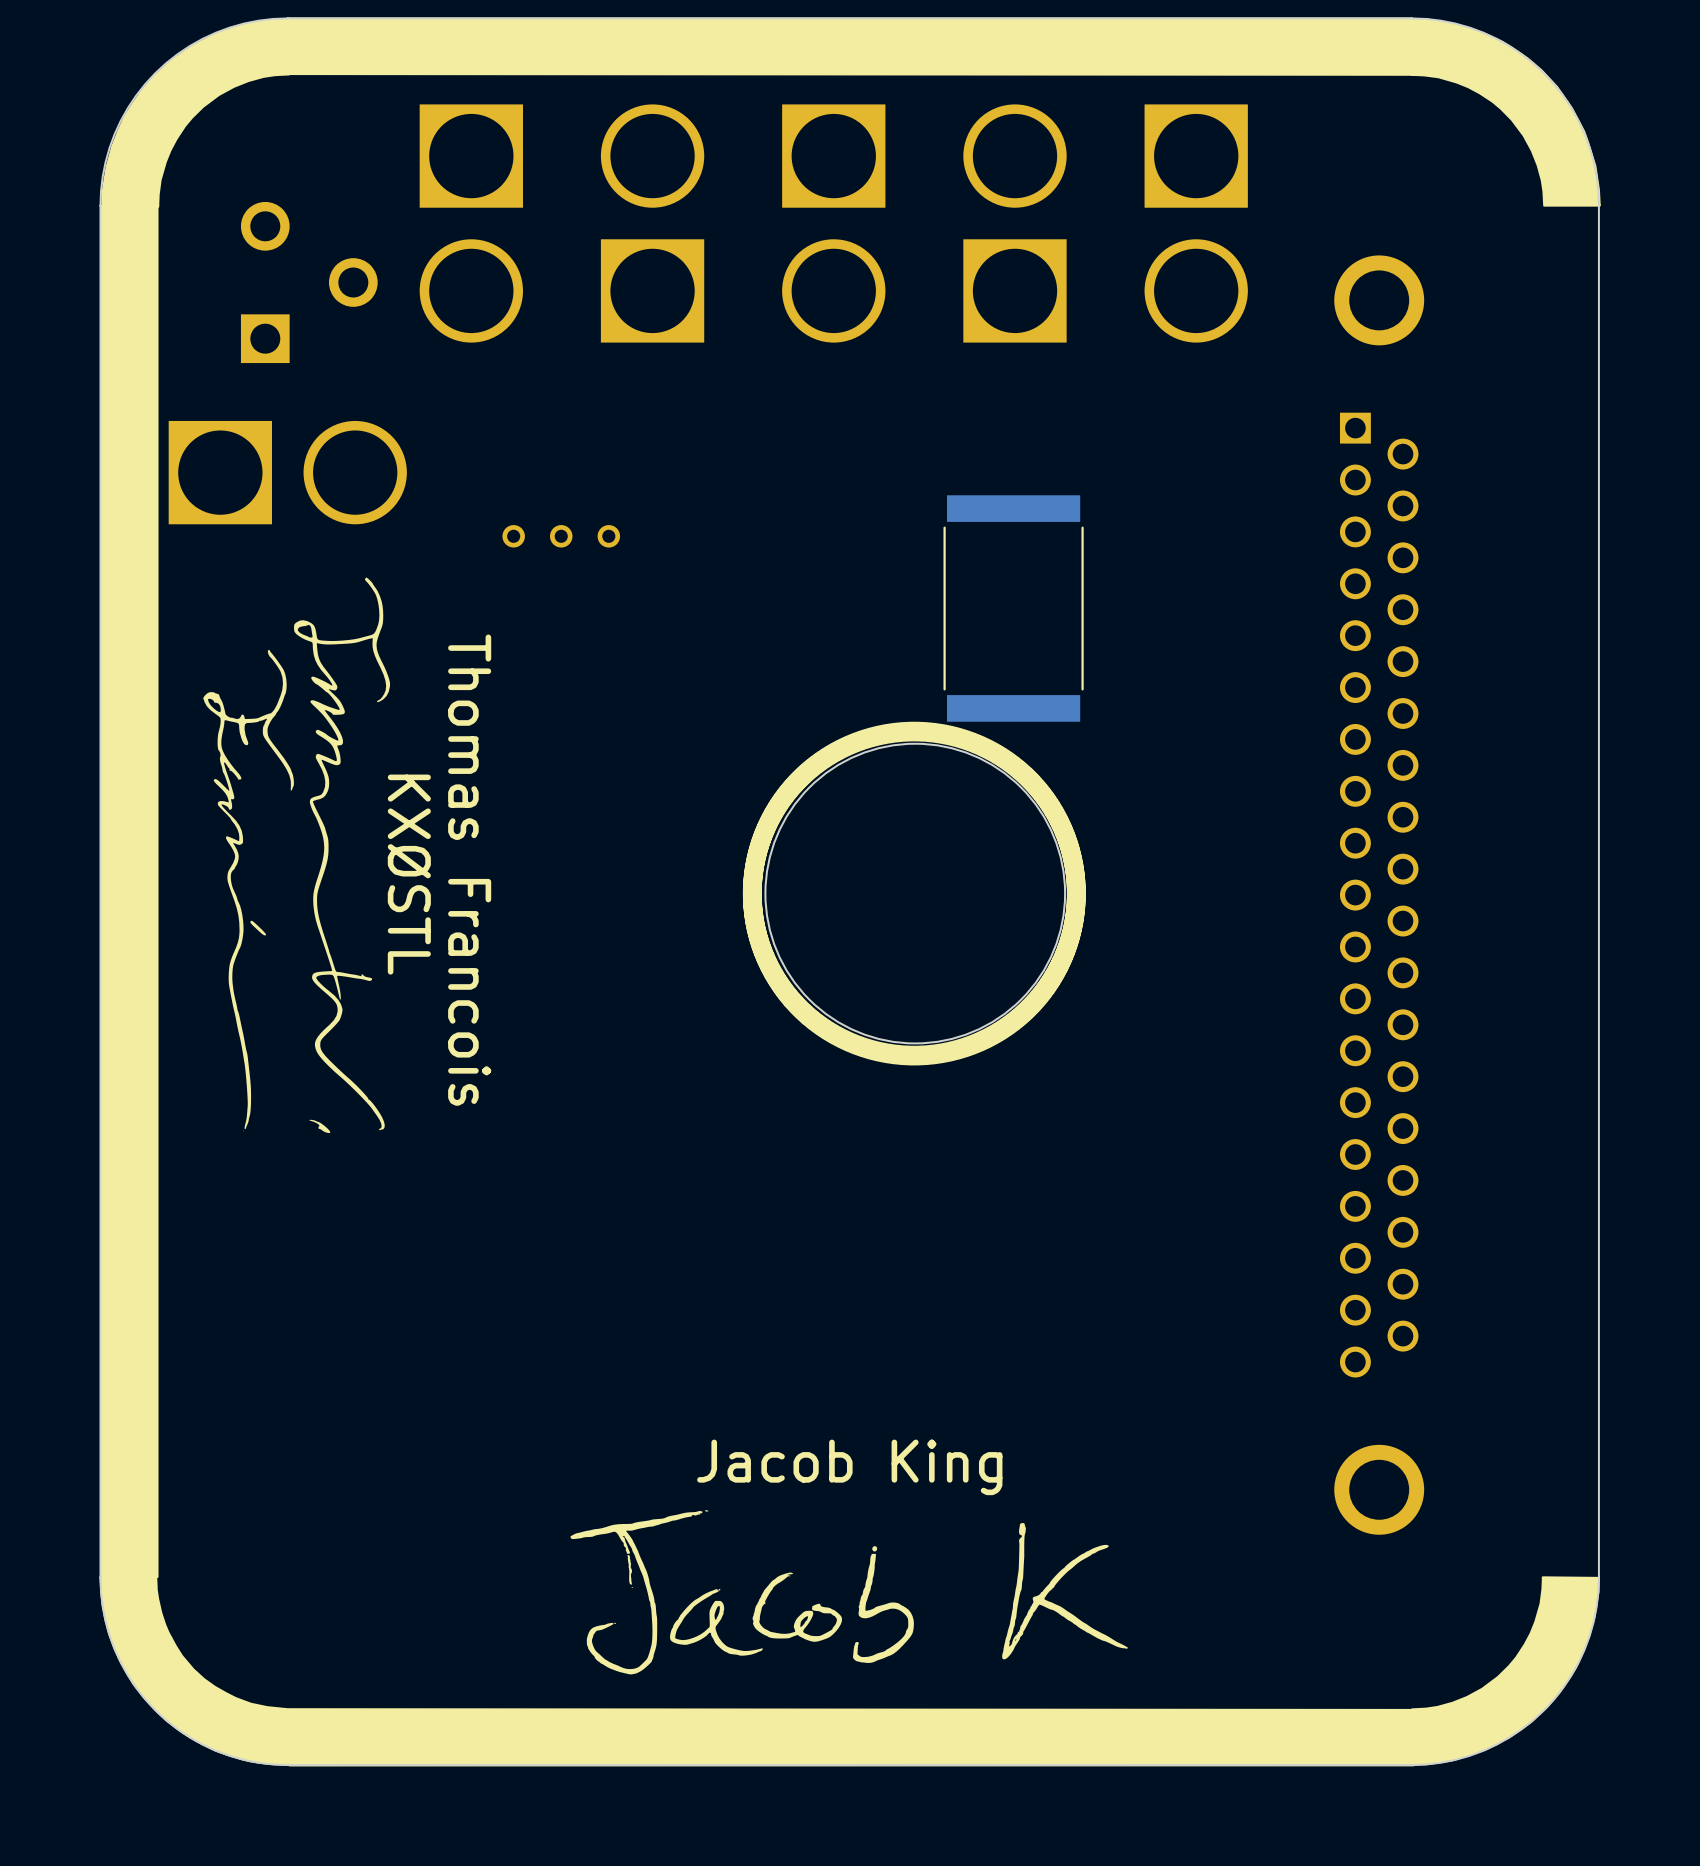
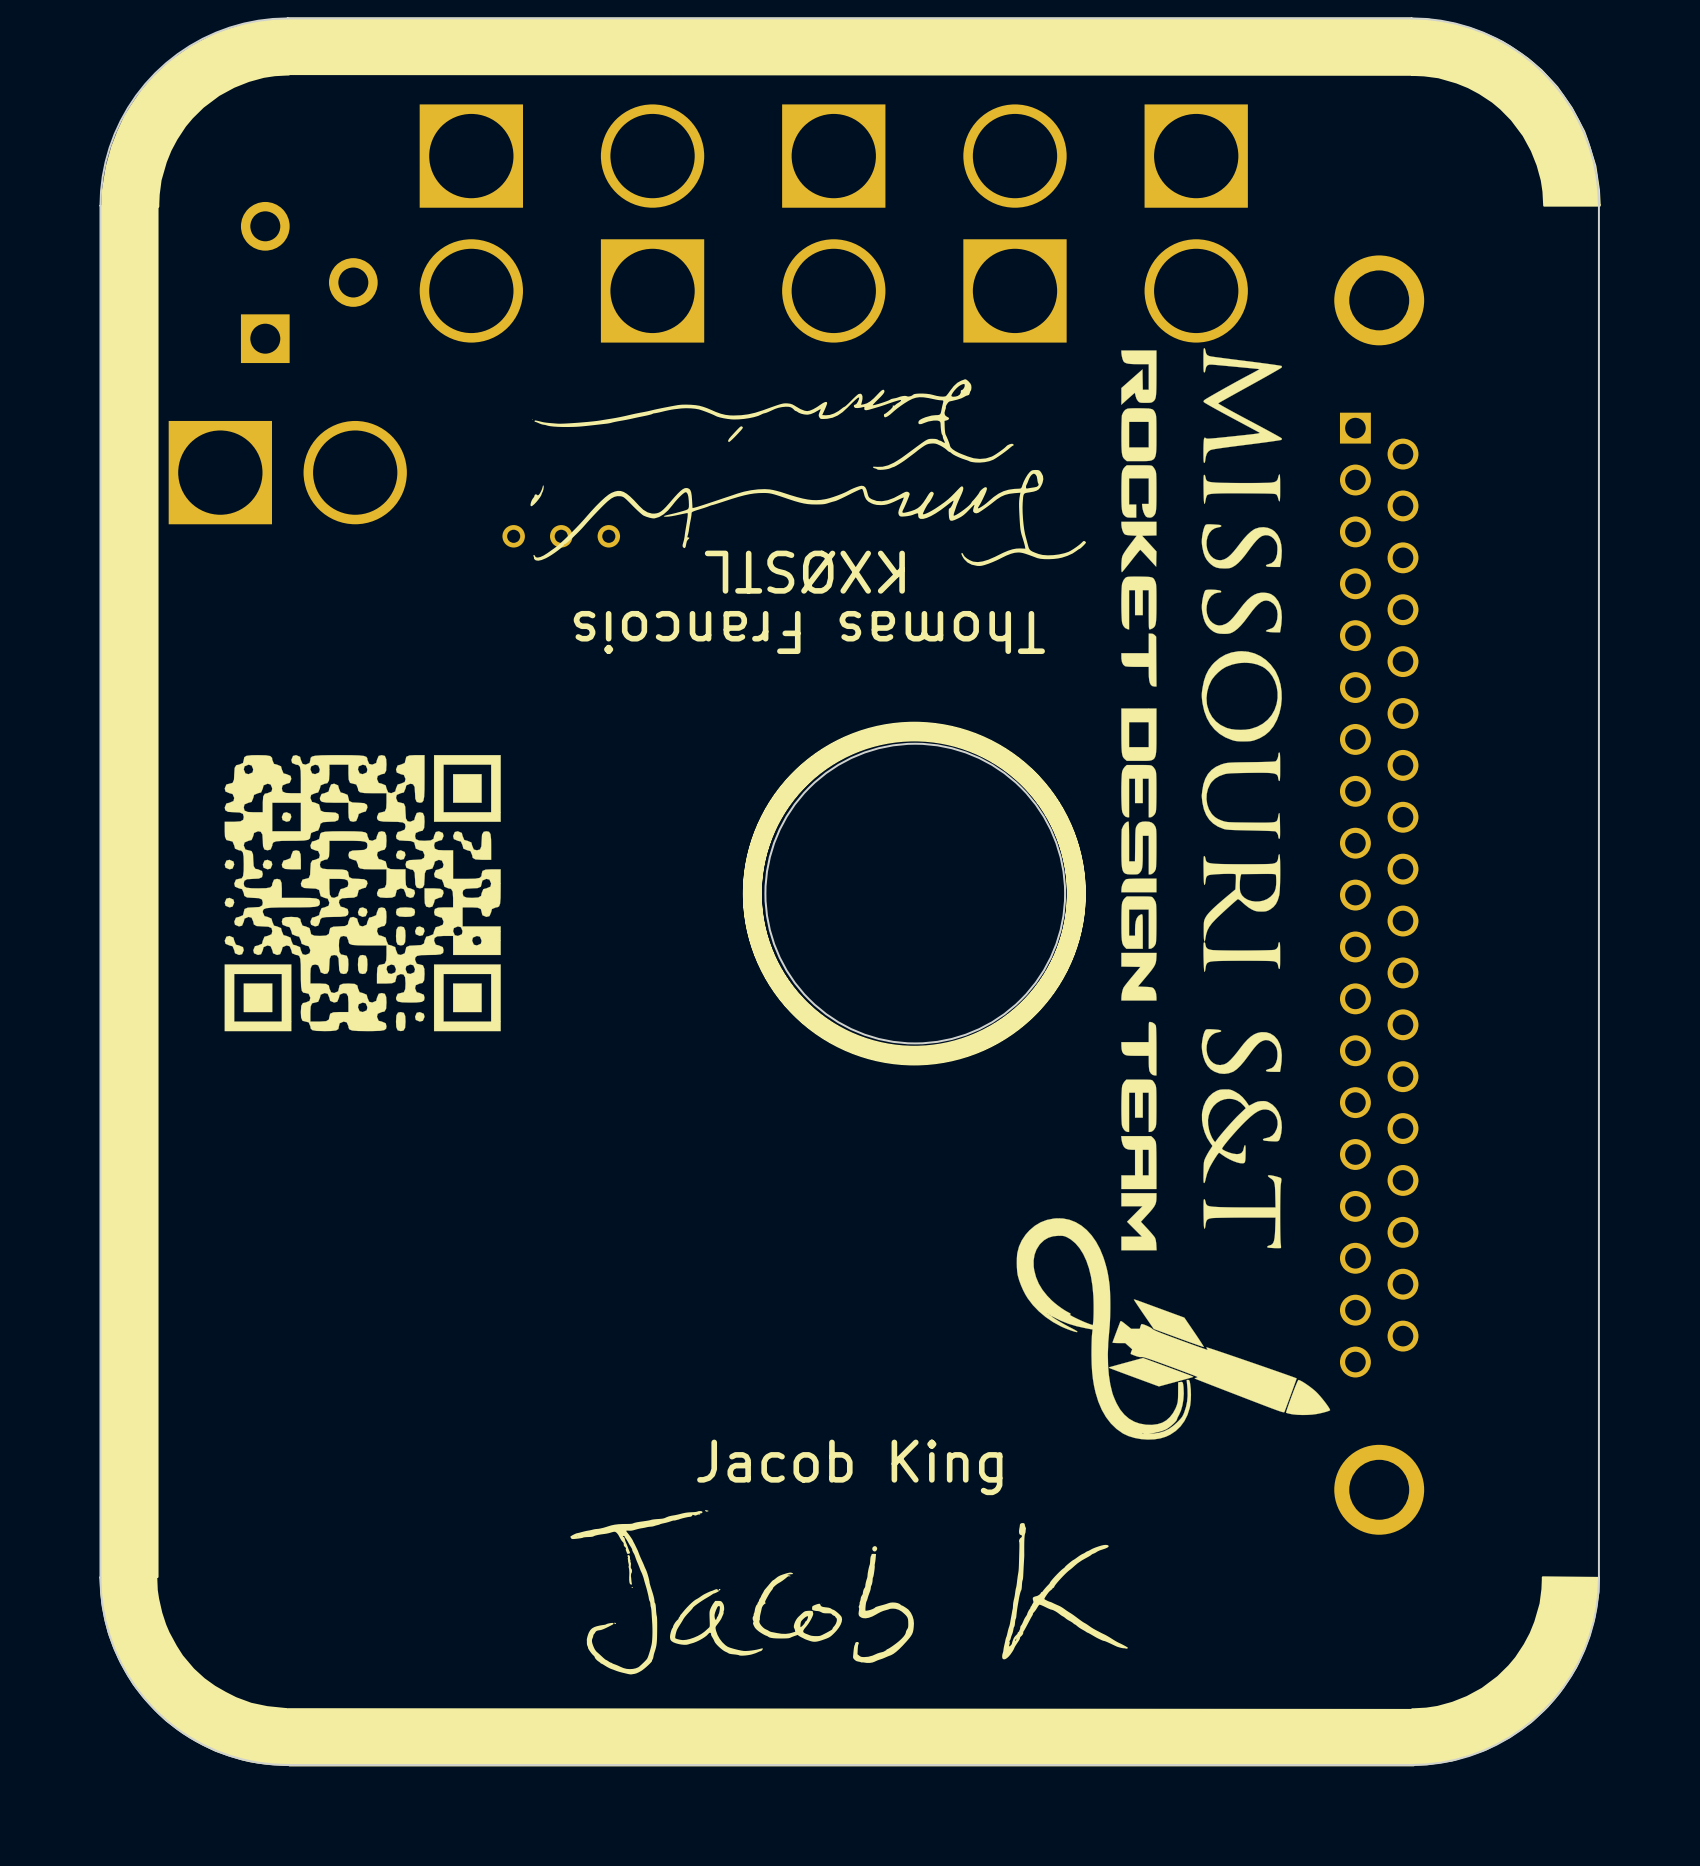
drawing: none -> [530, 348, 1331, 1440]
text: none -> KXØSTL (804, 572)
drawing: [203, 577, 391, 1134] -> none
part: (1013, 608) -> none
drawing: none -> [224, 755, 501, 1032]
text rotation: 0° (469, 870) -> 90° clockwise (809, 632)
text: KXØSTL (409, 874) -> none

